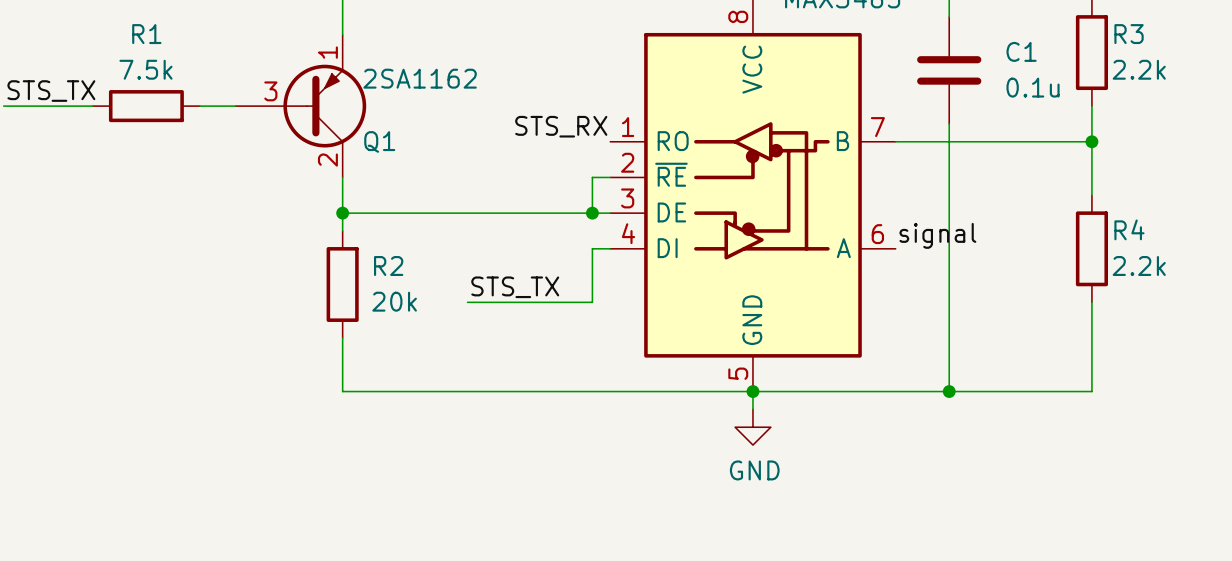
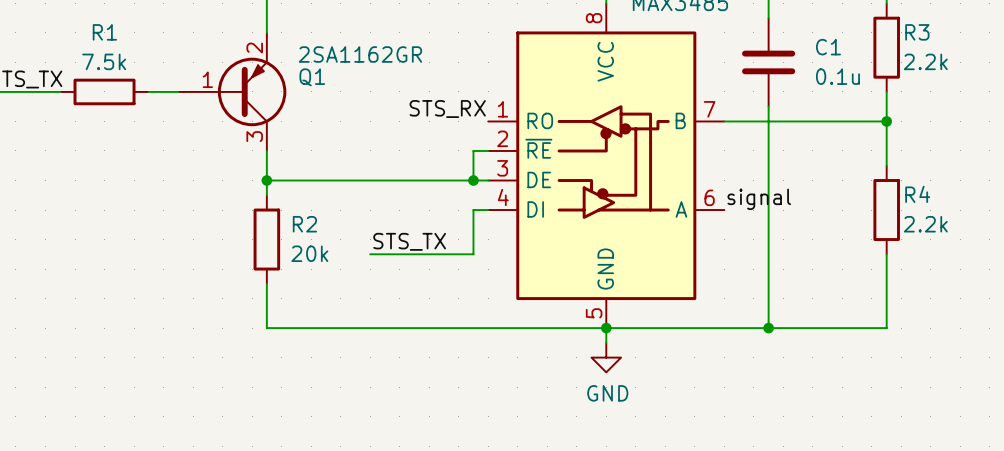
Q1 pin number: 1 (327, 52) -> 2 (254, 48)
Q1 value: 2SA1162 (420, 78) -> 2SA1162GR (360, 54)
Q1 pin number: 3 (270, 91) -> 1 (207, 79)
Q1 name position: Q1 (379, 141) -> Q1 (312, 77)
Q1 pin number: 2 (327, 160) -> 3 (254, 136)

